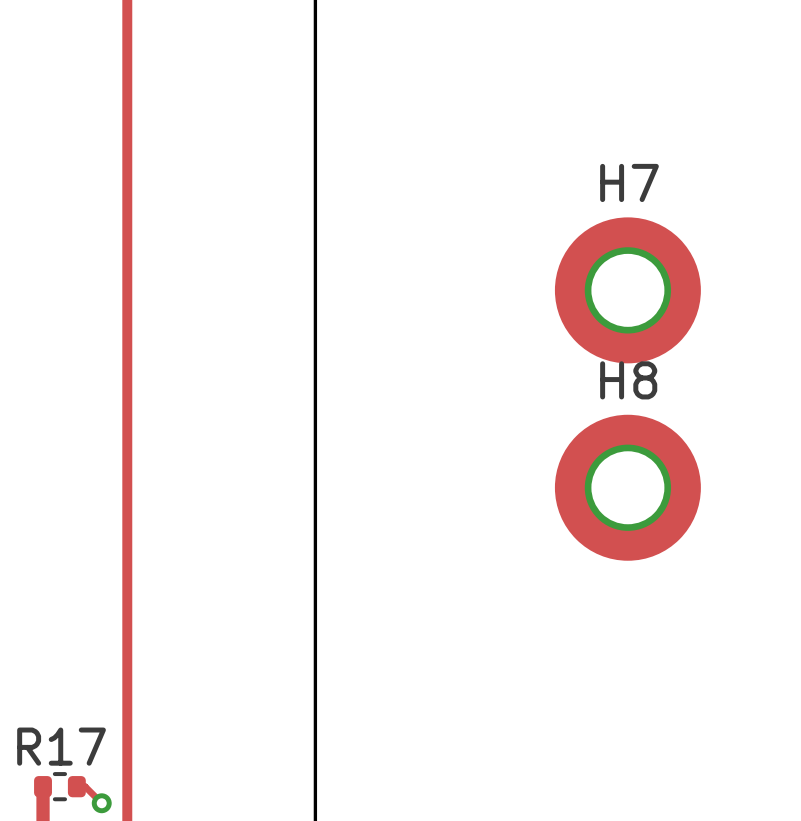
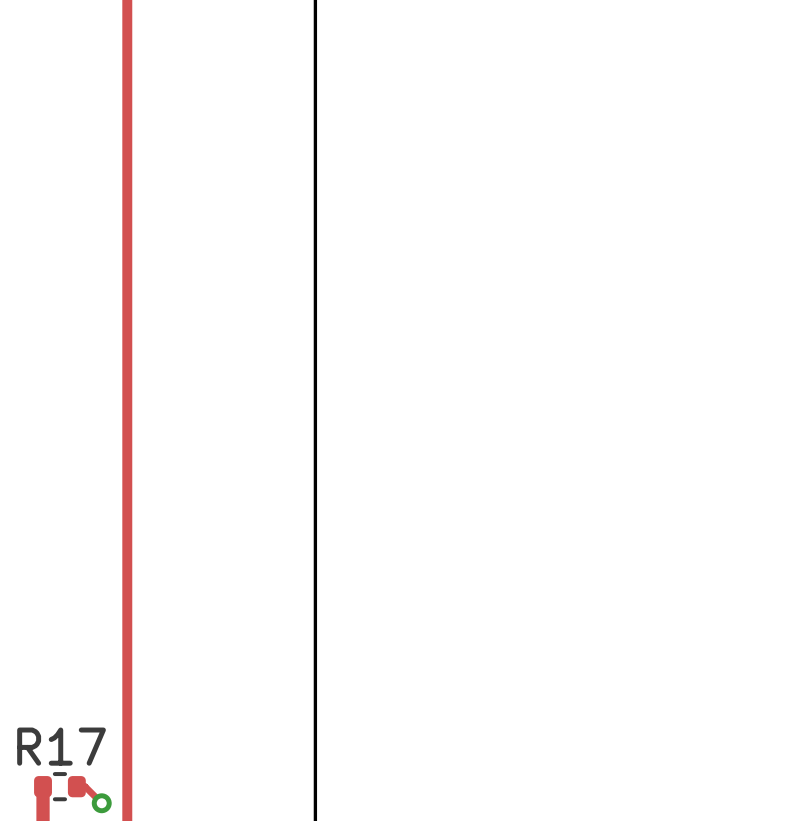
H7: (627, 290) -> none
H8: (627, 487) -> none

